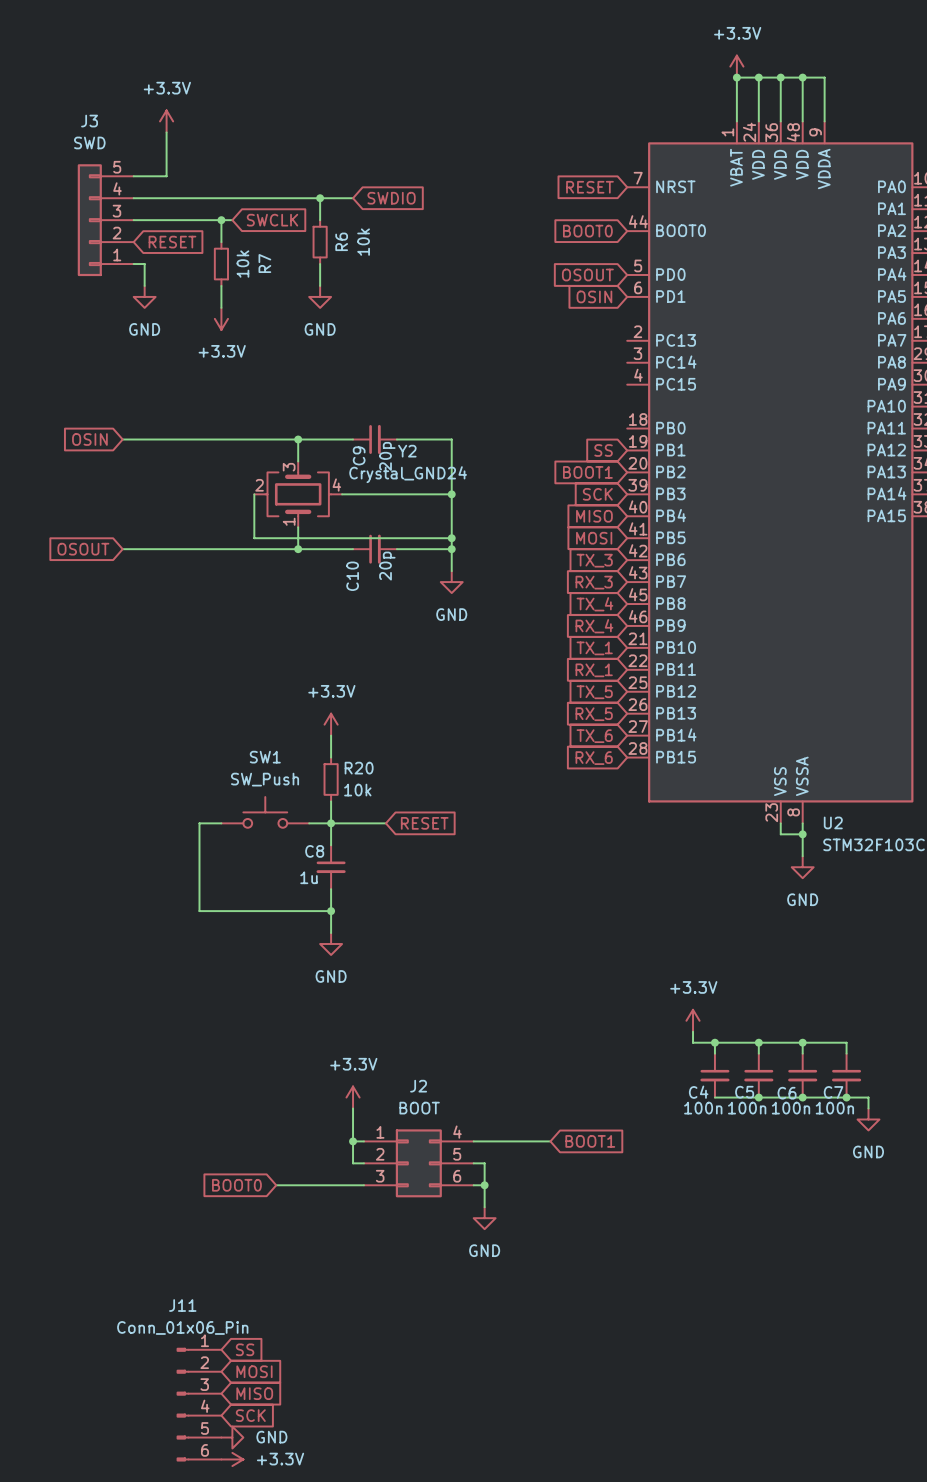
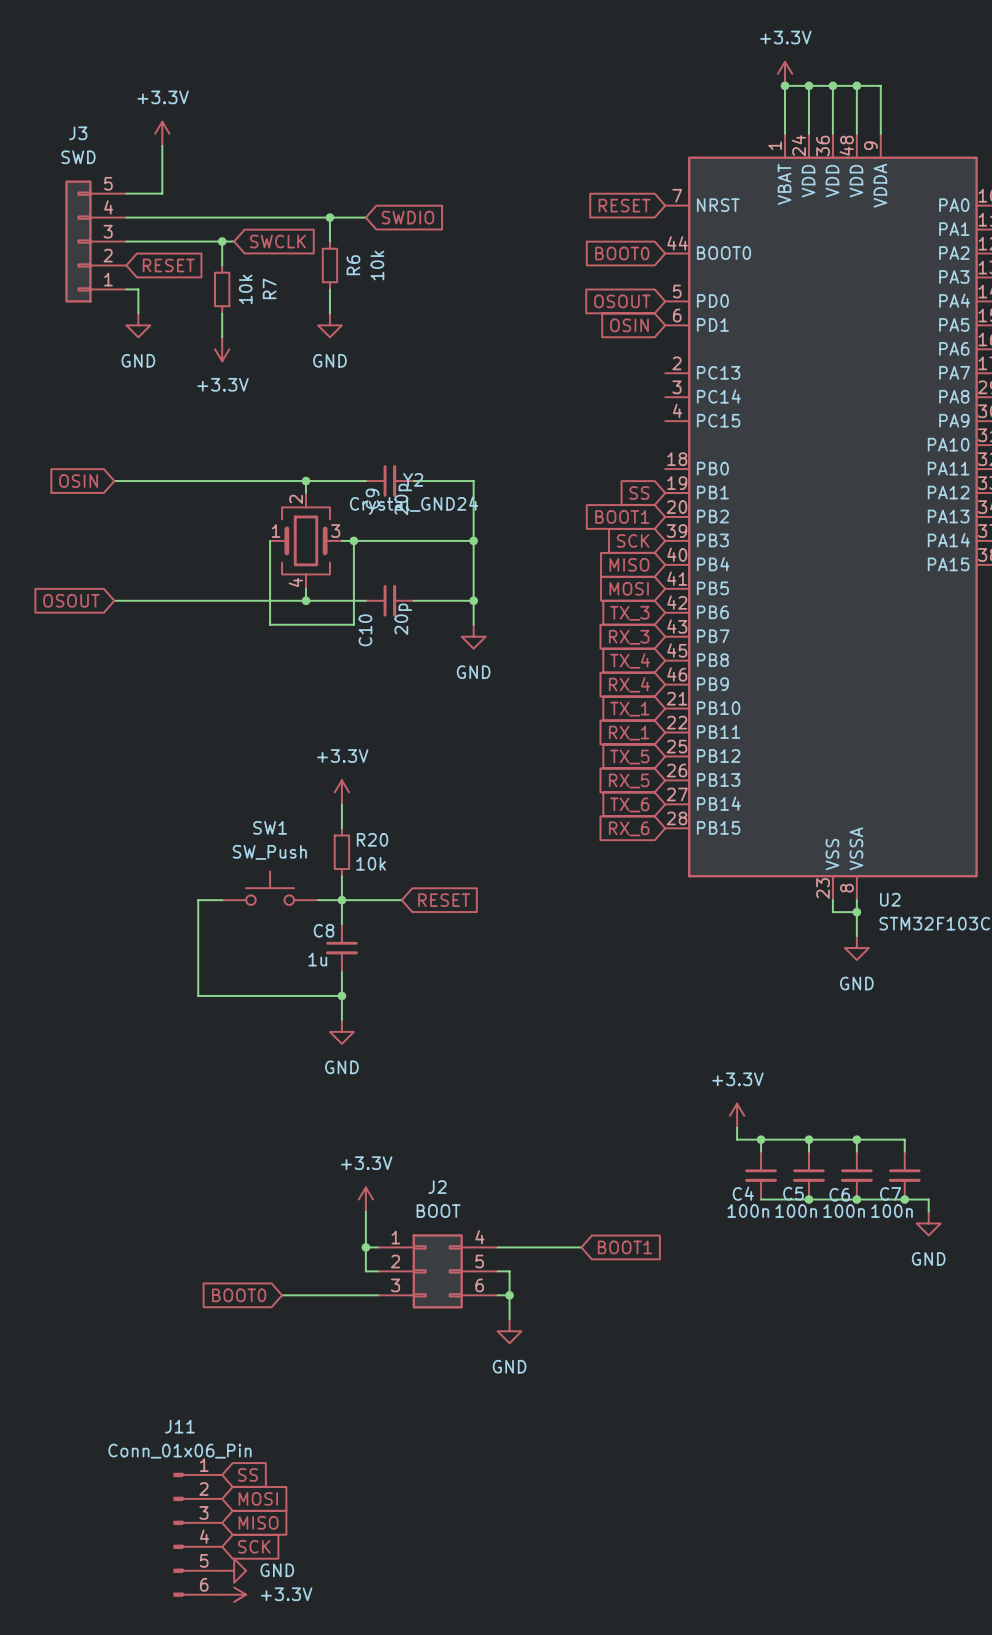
wire: (254, 494) (254, 538) (451, 538) -> none
wire: none -> (270, 540) (270, 624) (353, 624) (353, 540) (341, 540)
Y2 rotation: 0° (298, 494) -> 90° clockwise (306, 540)
junction: none -> (353, 540)
junction: (451, 538) -> none

